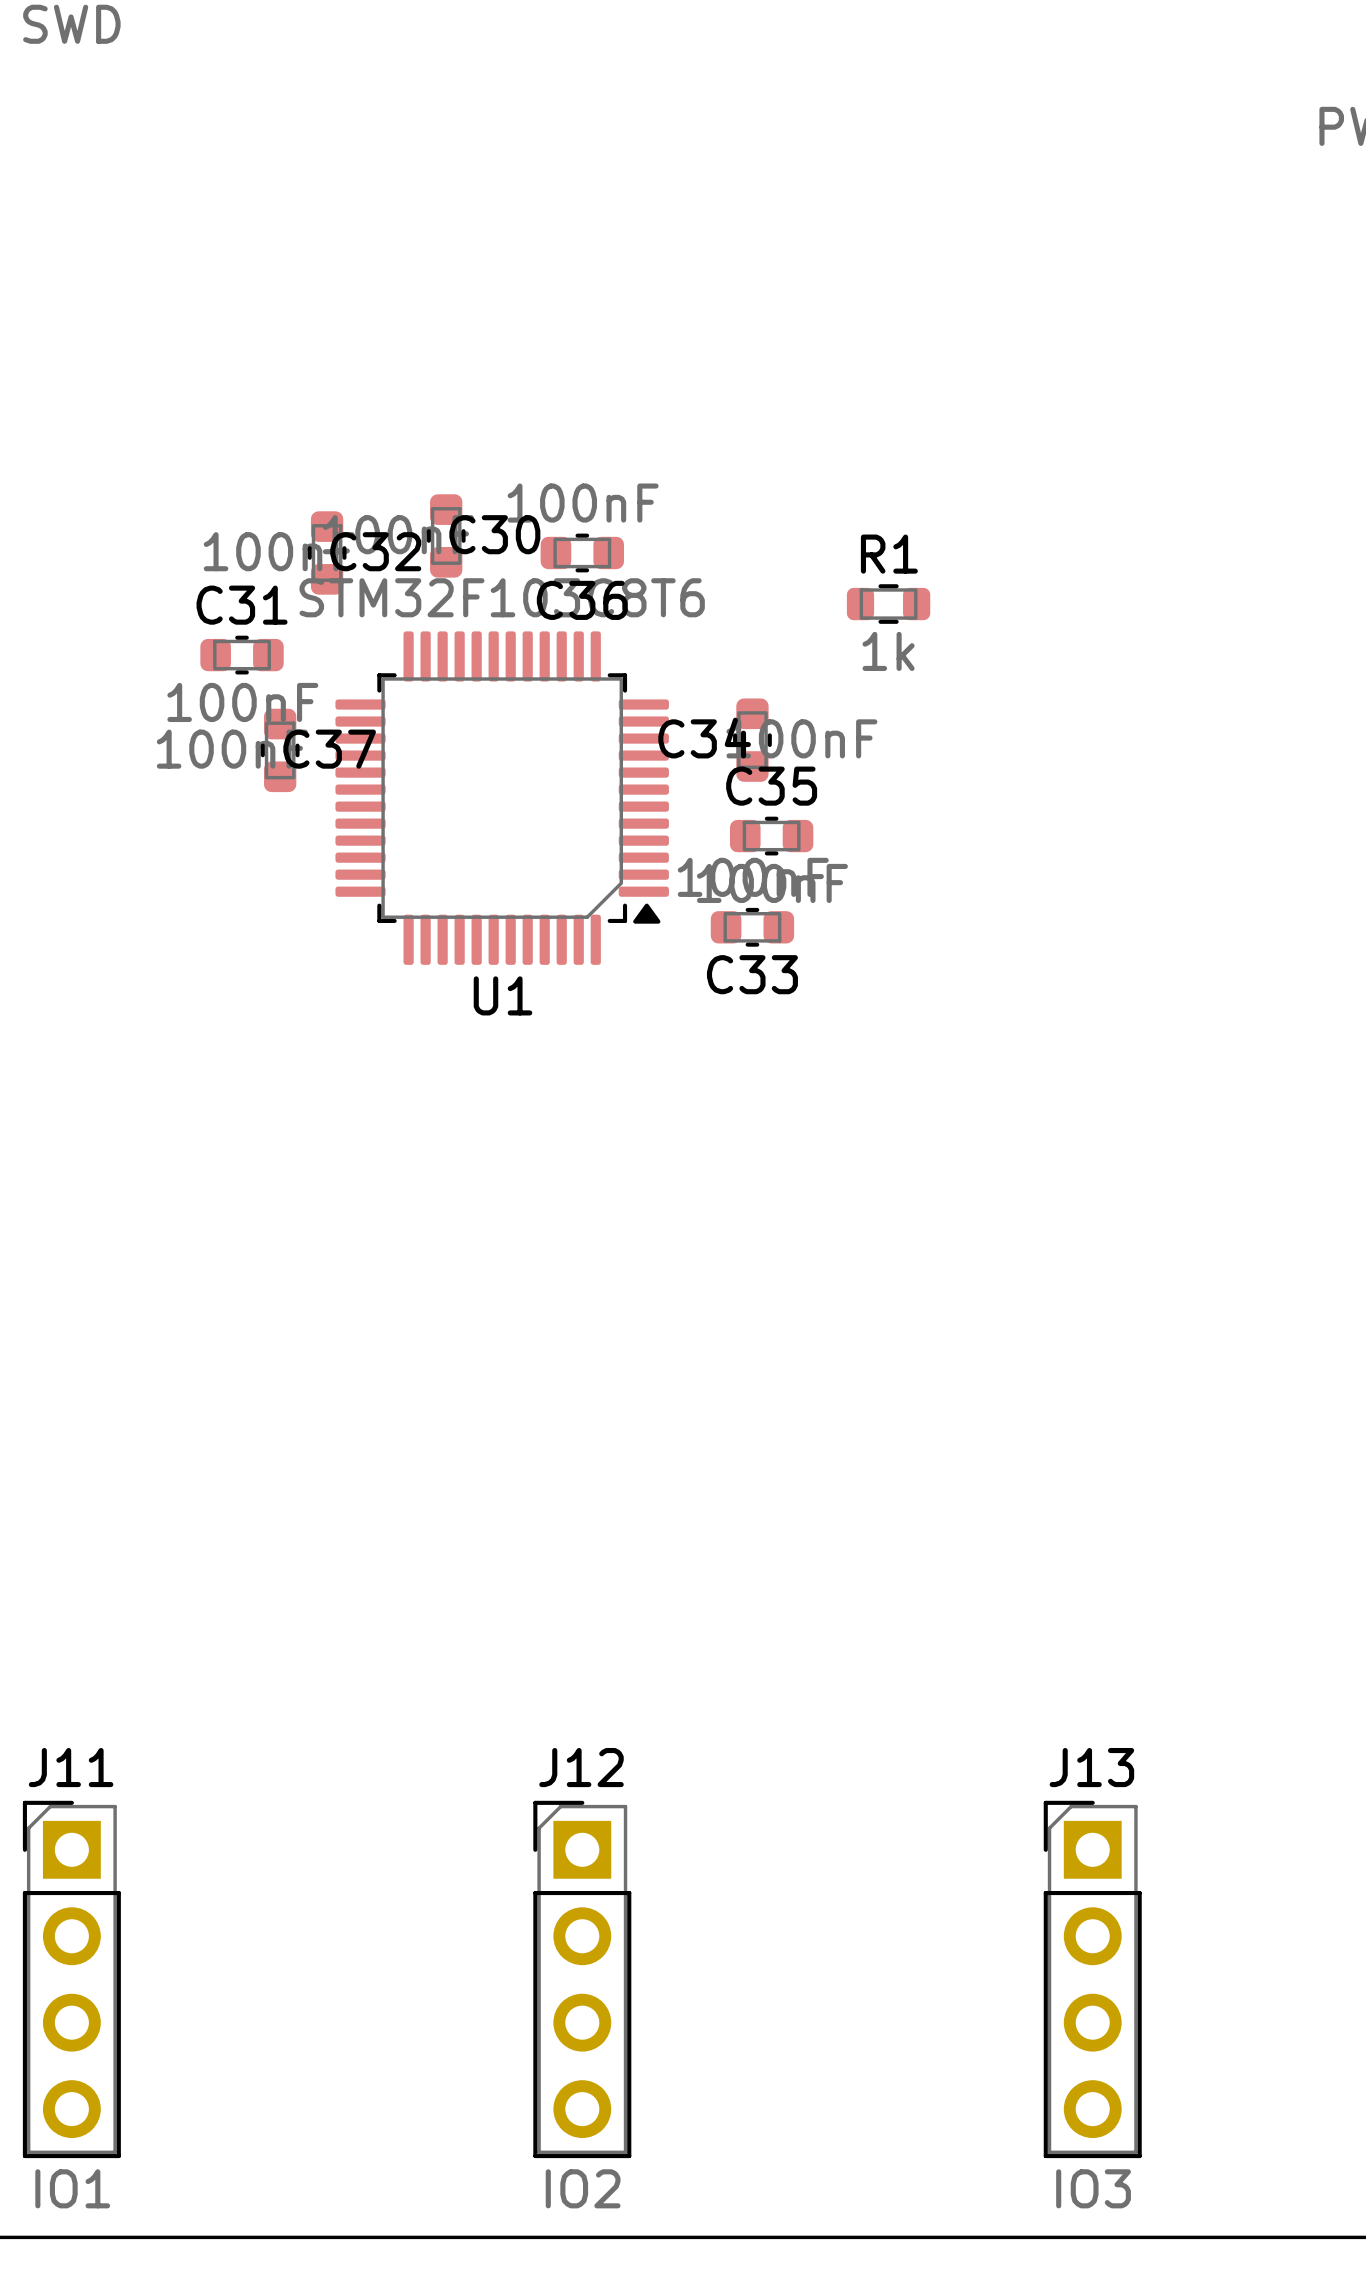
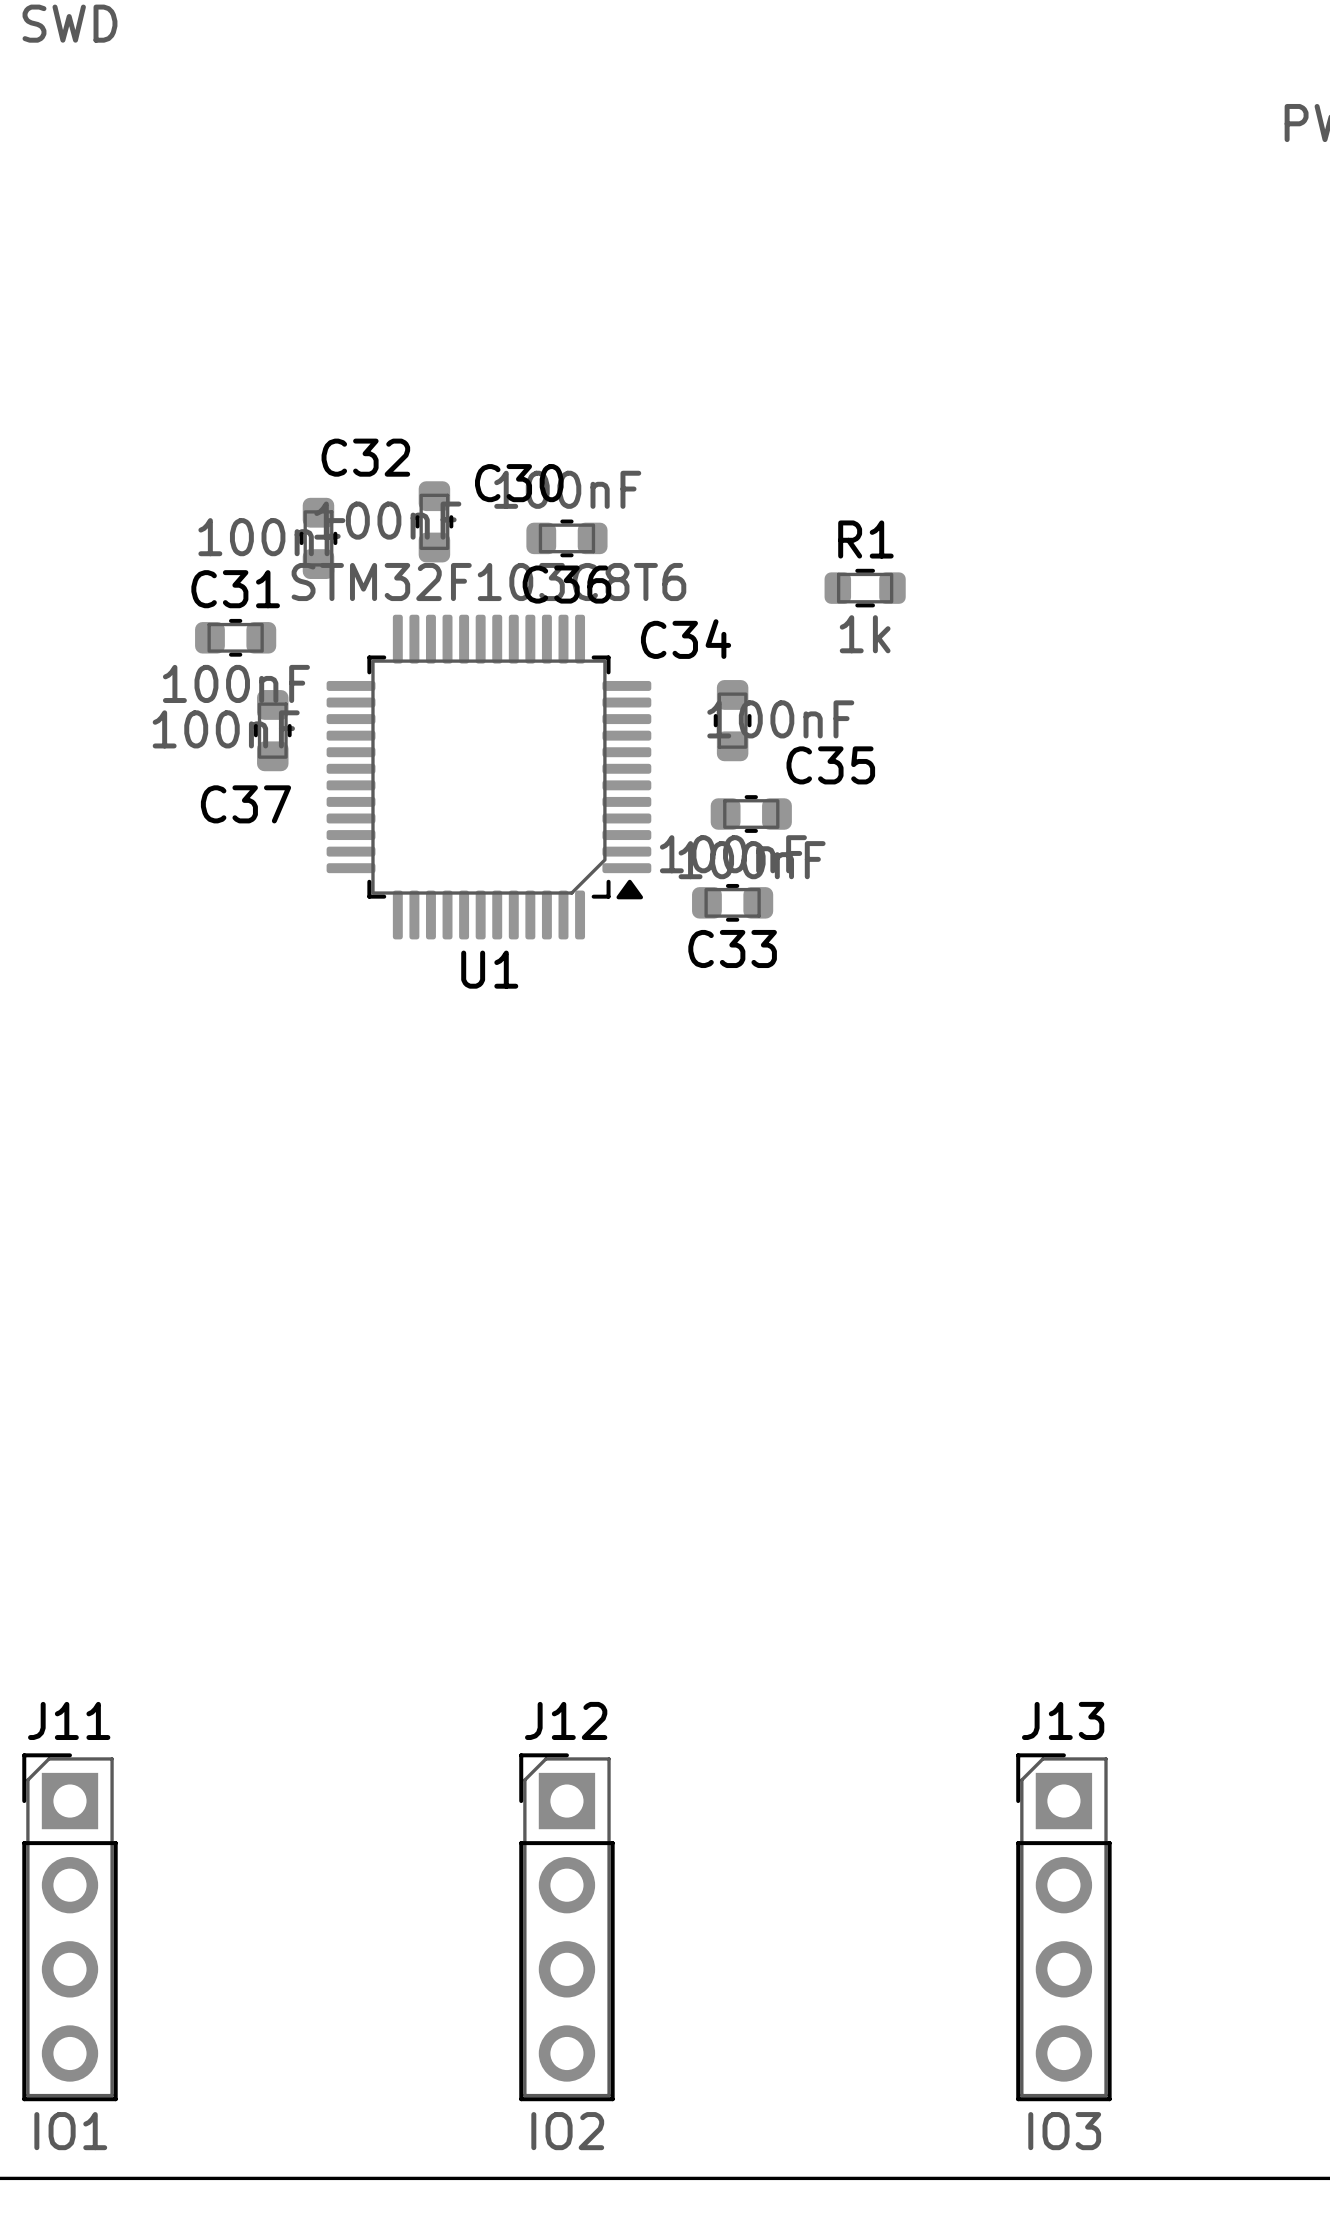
C30 name position: C30 (494, 534) -> C30 (519, 483)
C32 name position: C32 (375, 551) -> C32 (365, 457)
C34 name position: C34 (704, 738) -> C34 (686, 639)
C37 name position: C37 (329, 749) -> C37 (245, 804)
C35 name position: C35 (771, 786) -> C35 (830, 765)

